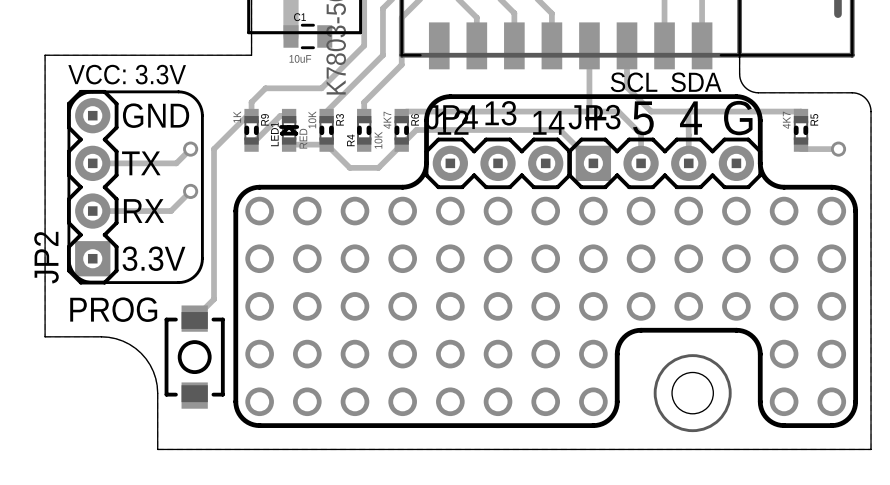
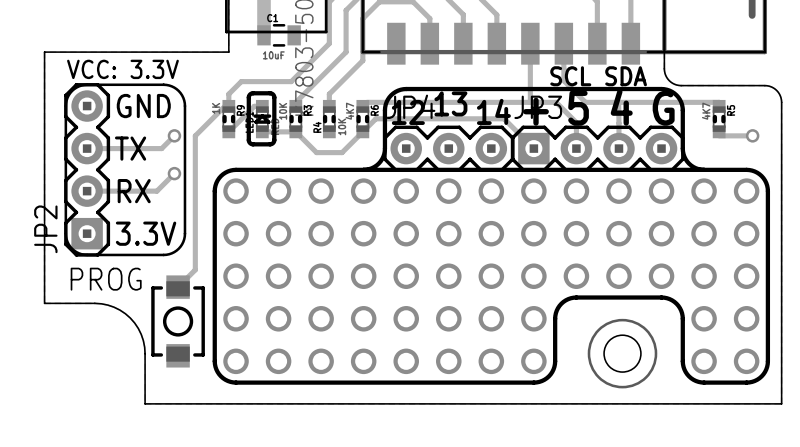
line: none -> (253, 93) (270, 93) (274, 95) (274, 140) (271, 144) (252, 144) (249, 141) (248, 96) (253, 93)
line: none -> (363, 169) (704, 169)

